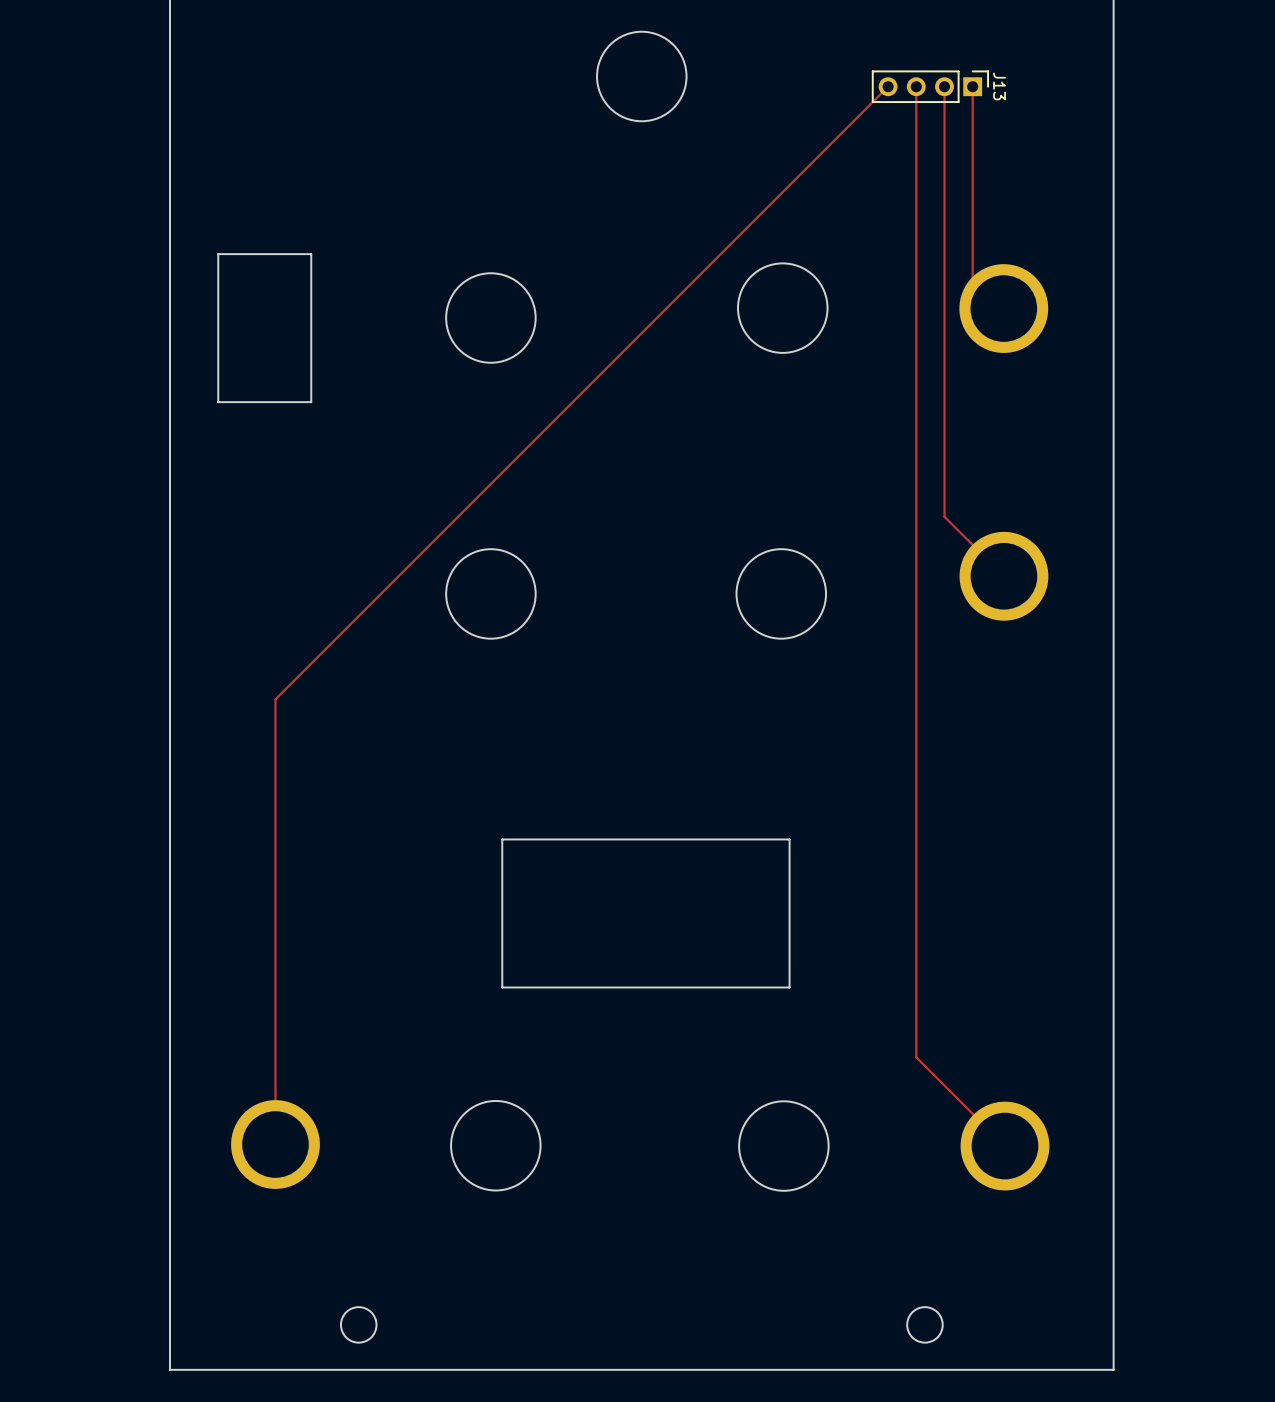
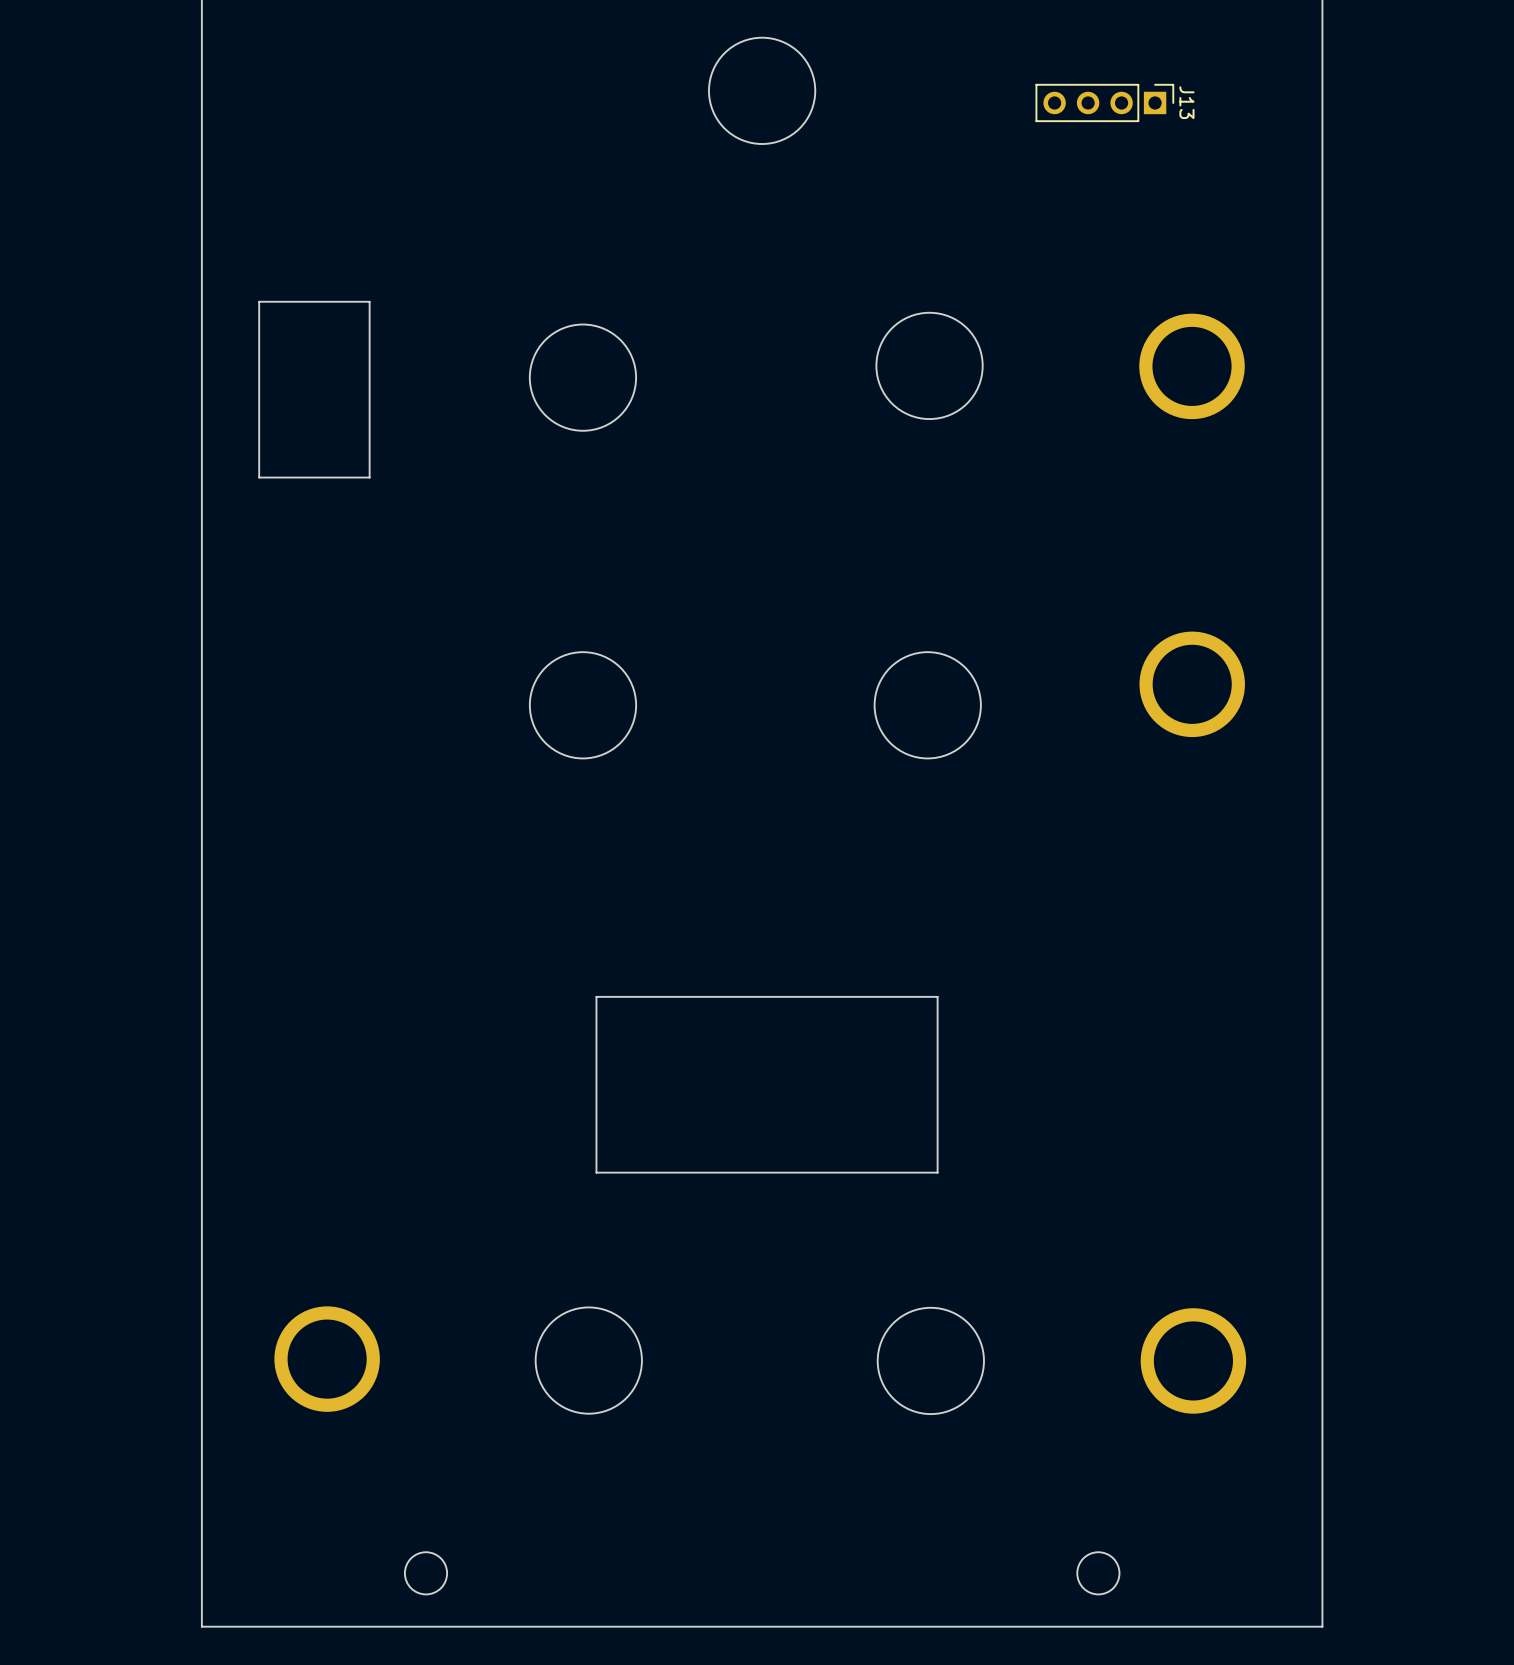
top track: (888, 86) (275, 699) (275, 1144) -> none
top track: (916, 86) (916, 1057) (1004, 1146) -> none
top track: (944, 86) (944, 516) (1003, 576) -> none
top track: (972, 86) (972, 277) (1003, 308) -> none

